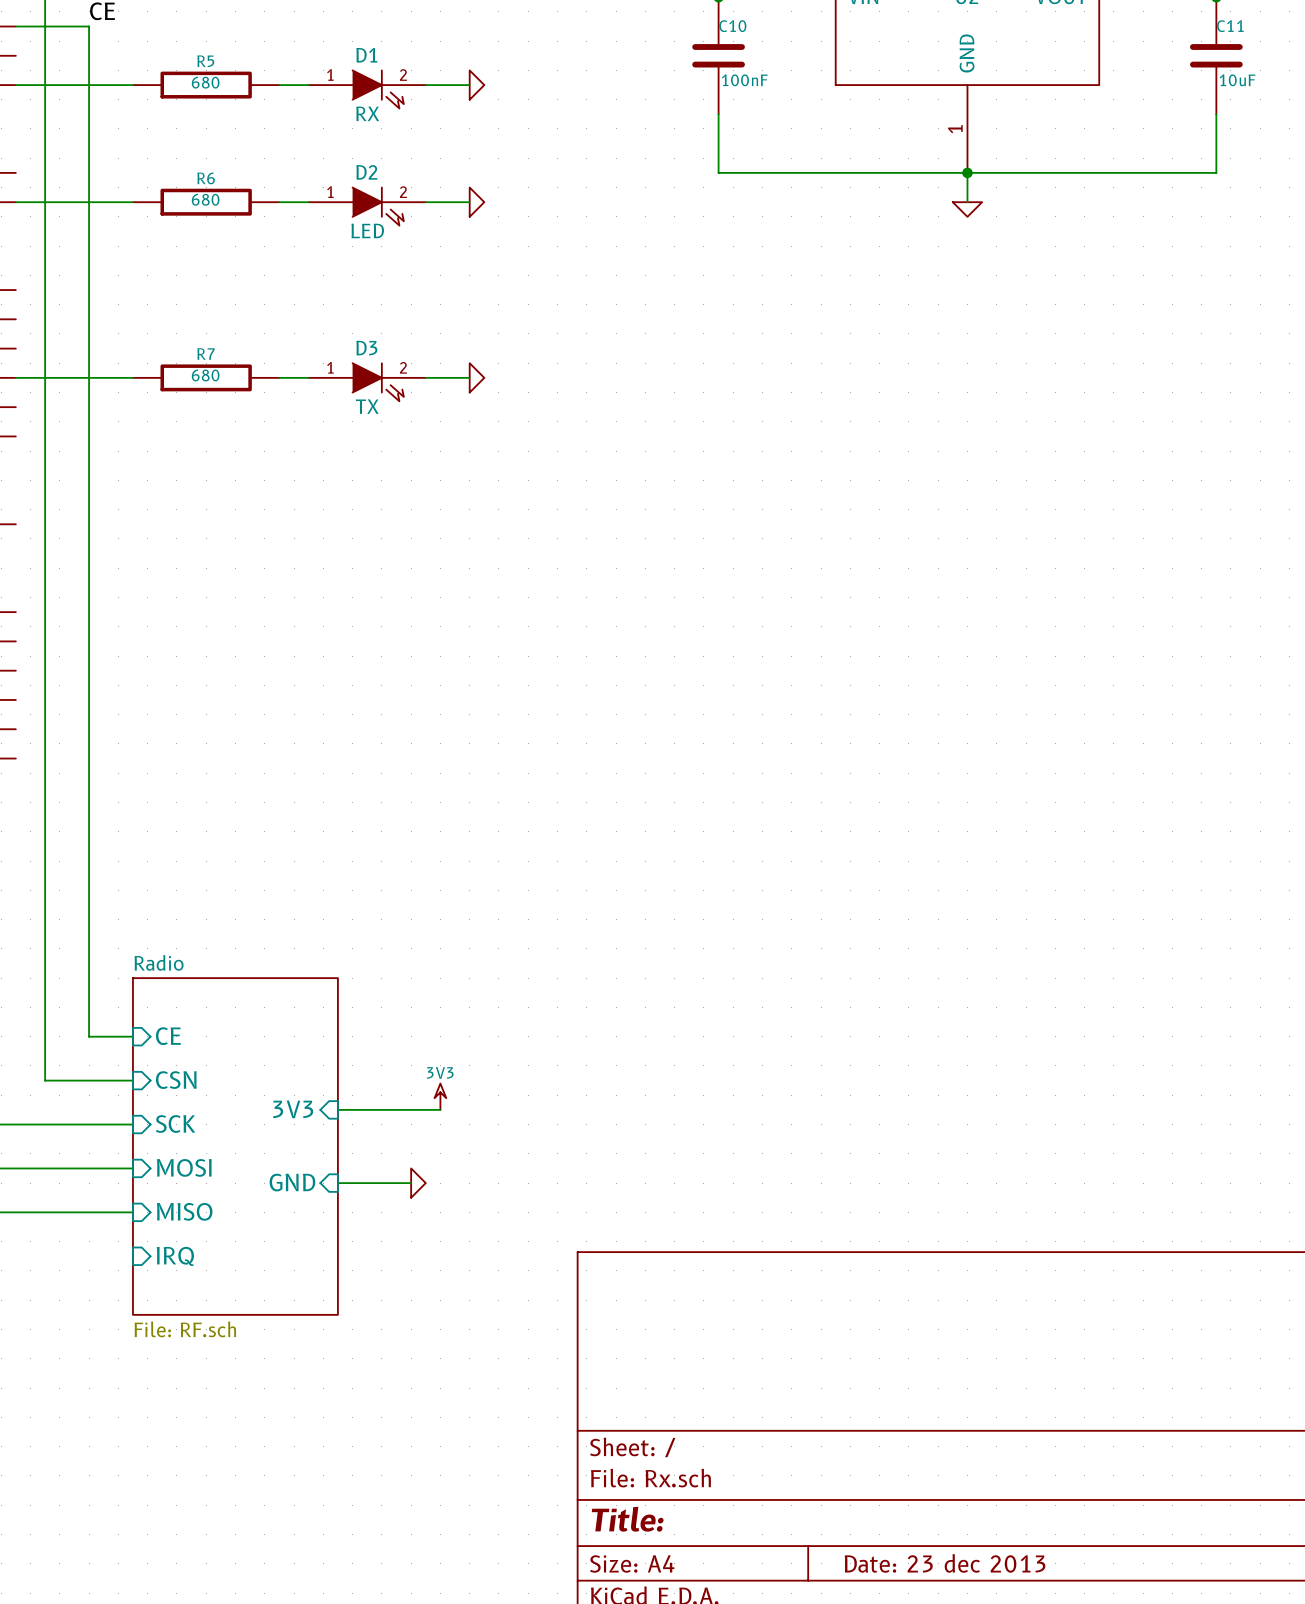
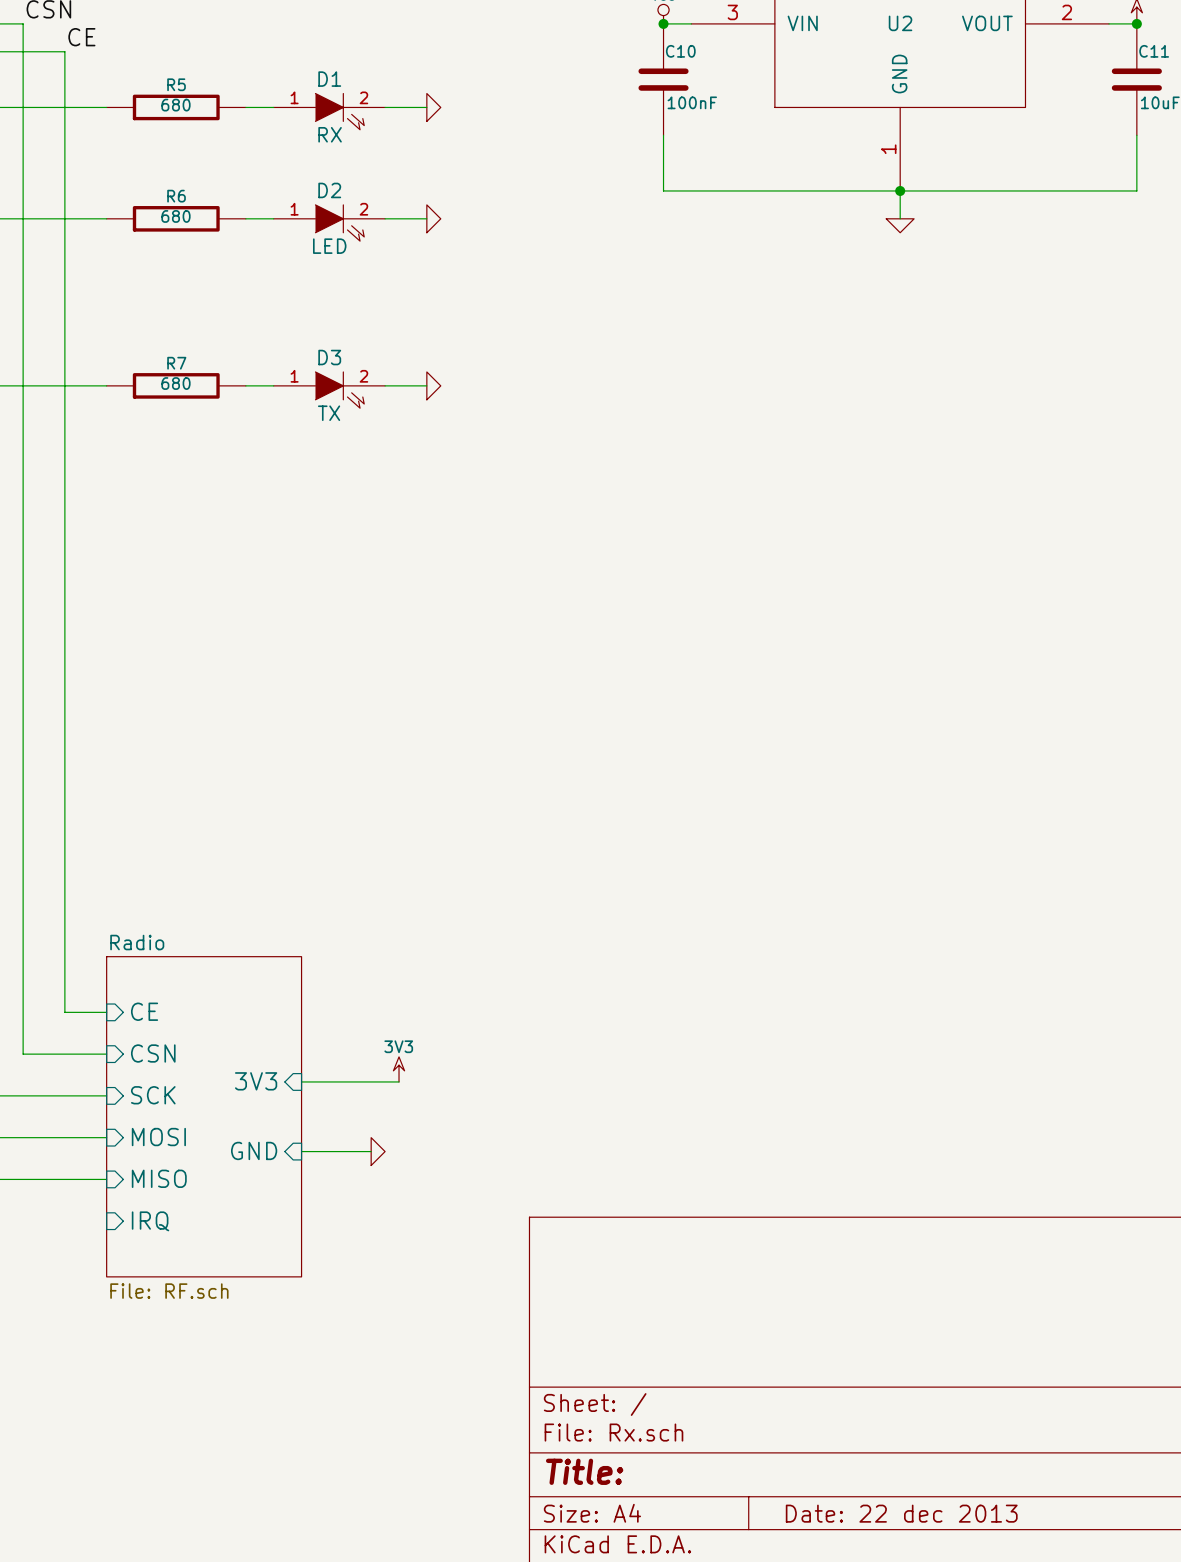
title block: Date: 23 dec 2013 (945, 1563) -> Date: 22 dec 2013 (901, 1513)

